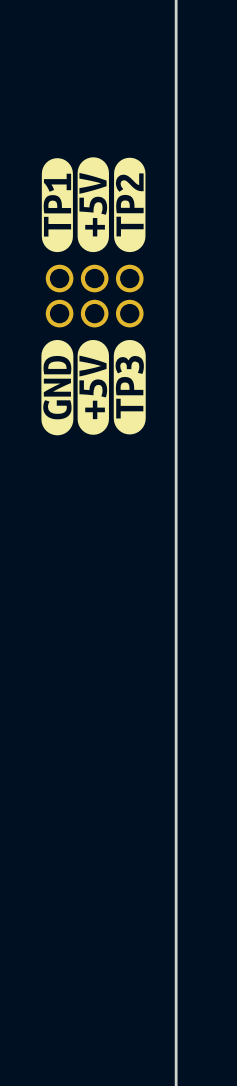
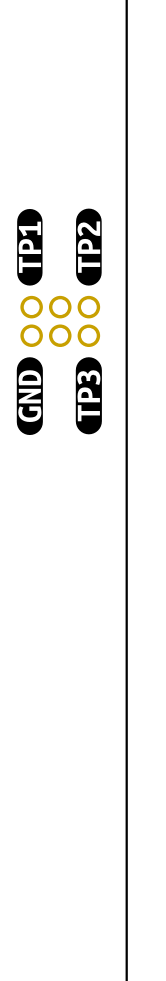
drawing: [77, 157, 109, 253] -> none
drawing: [77, 339, 109, 435] -> none

